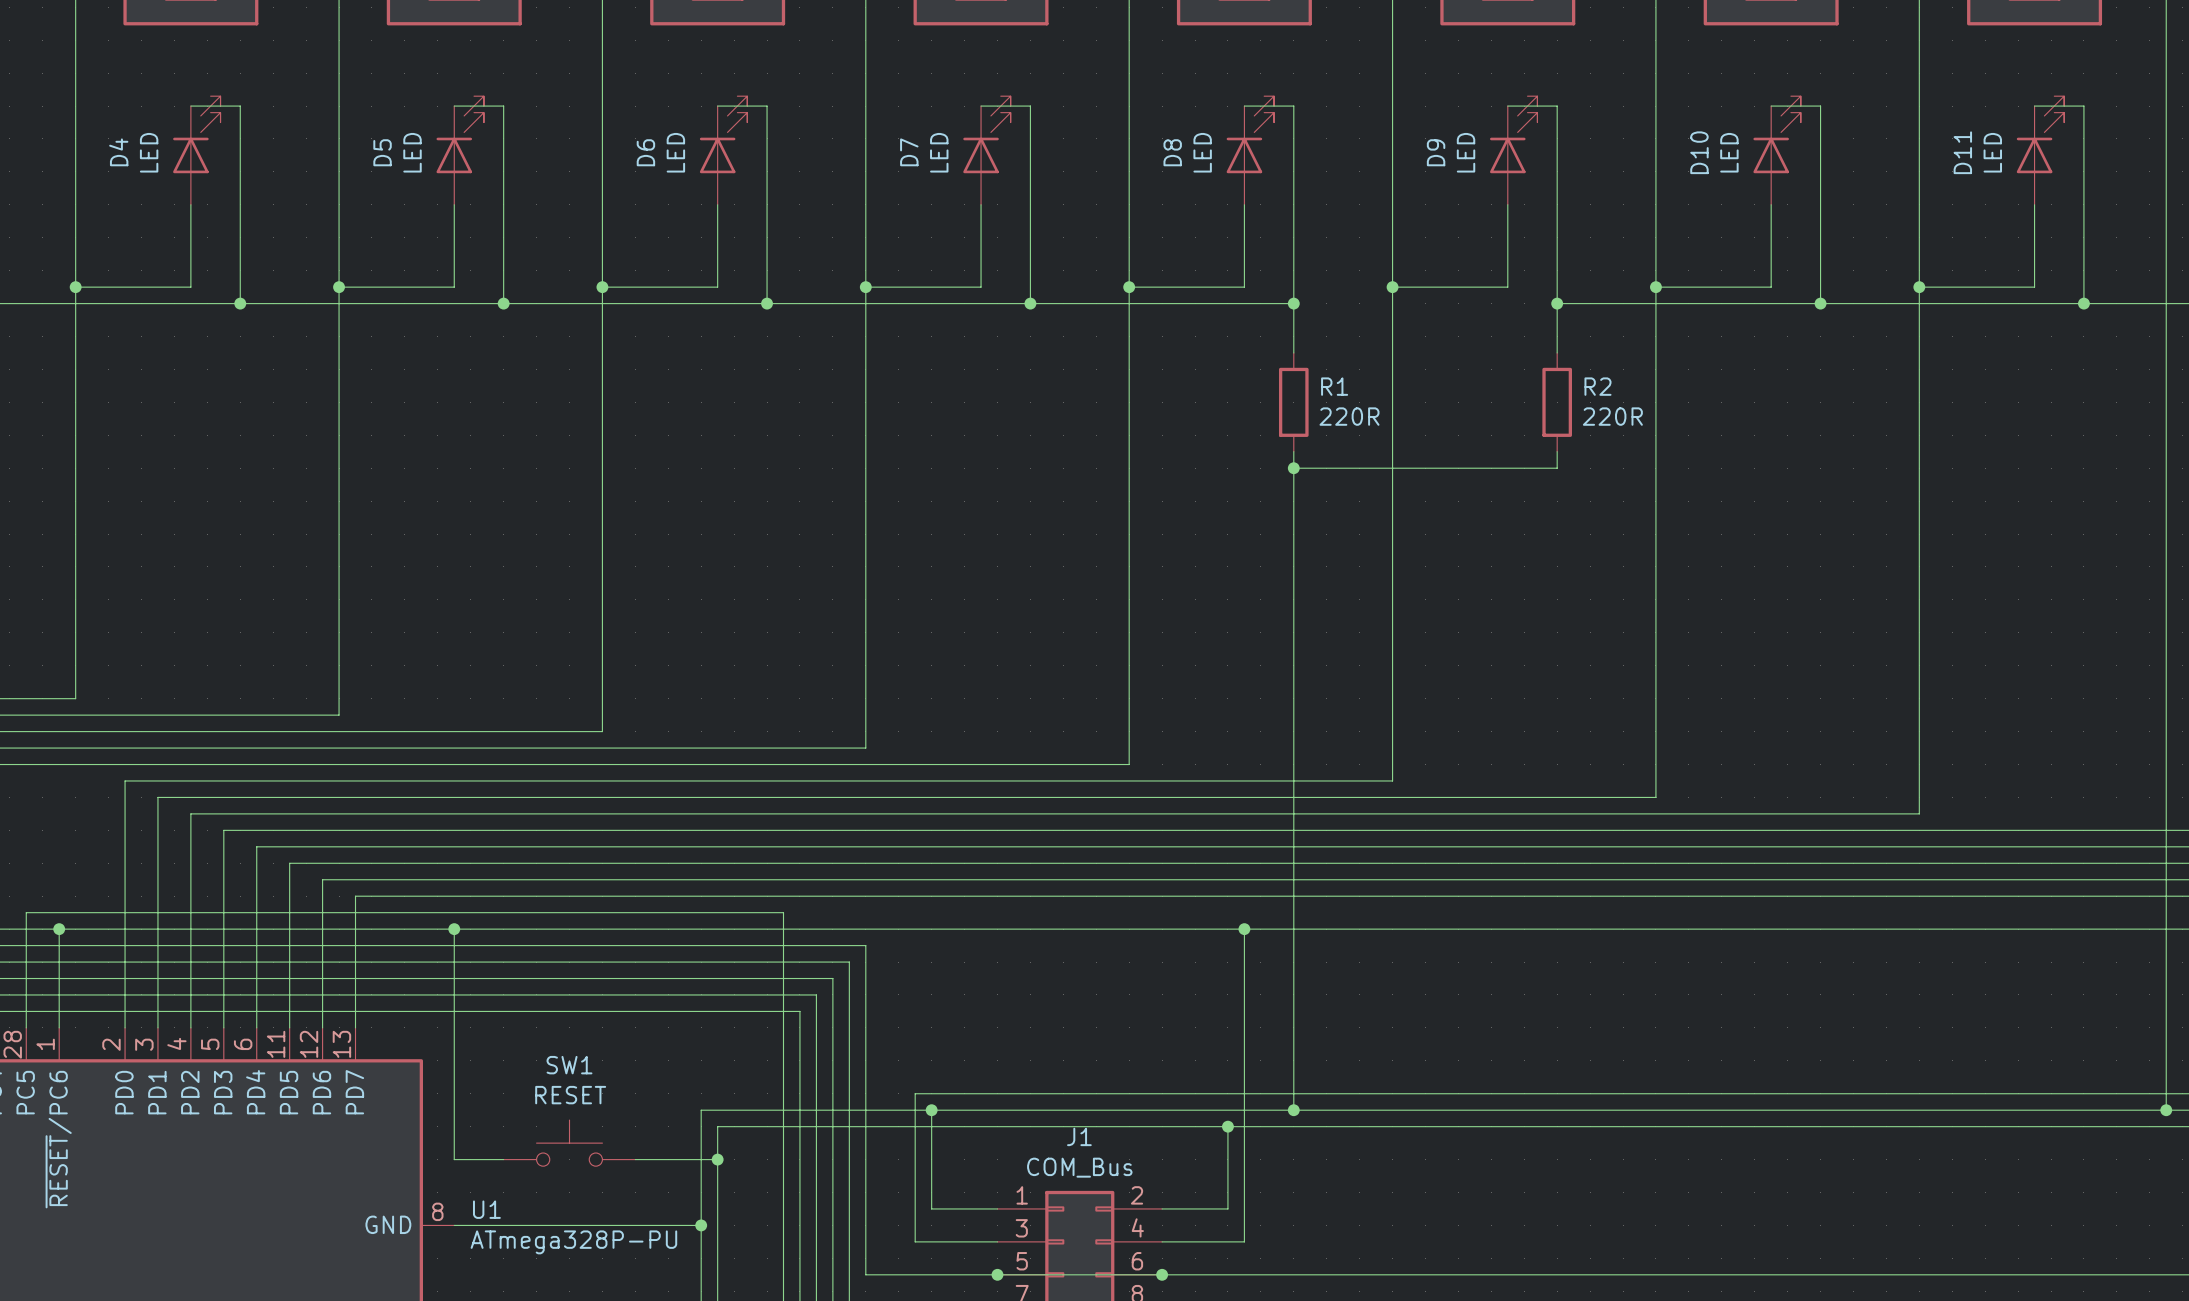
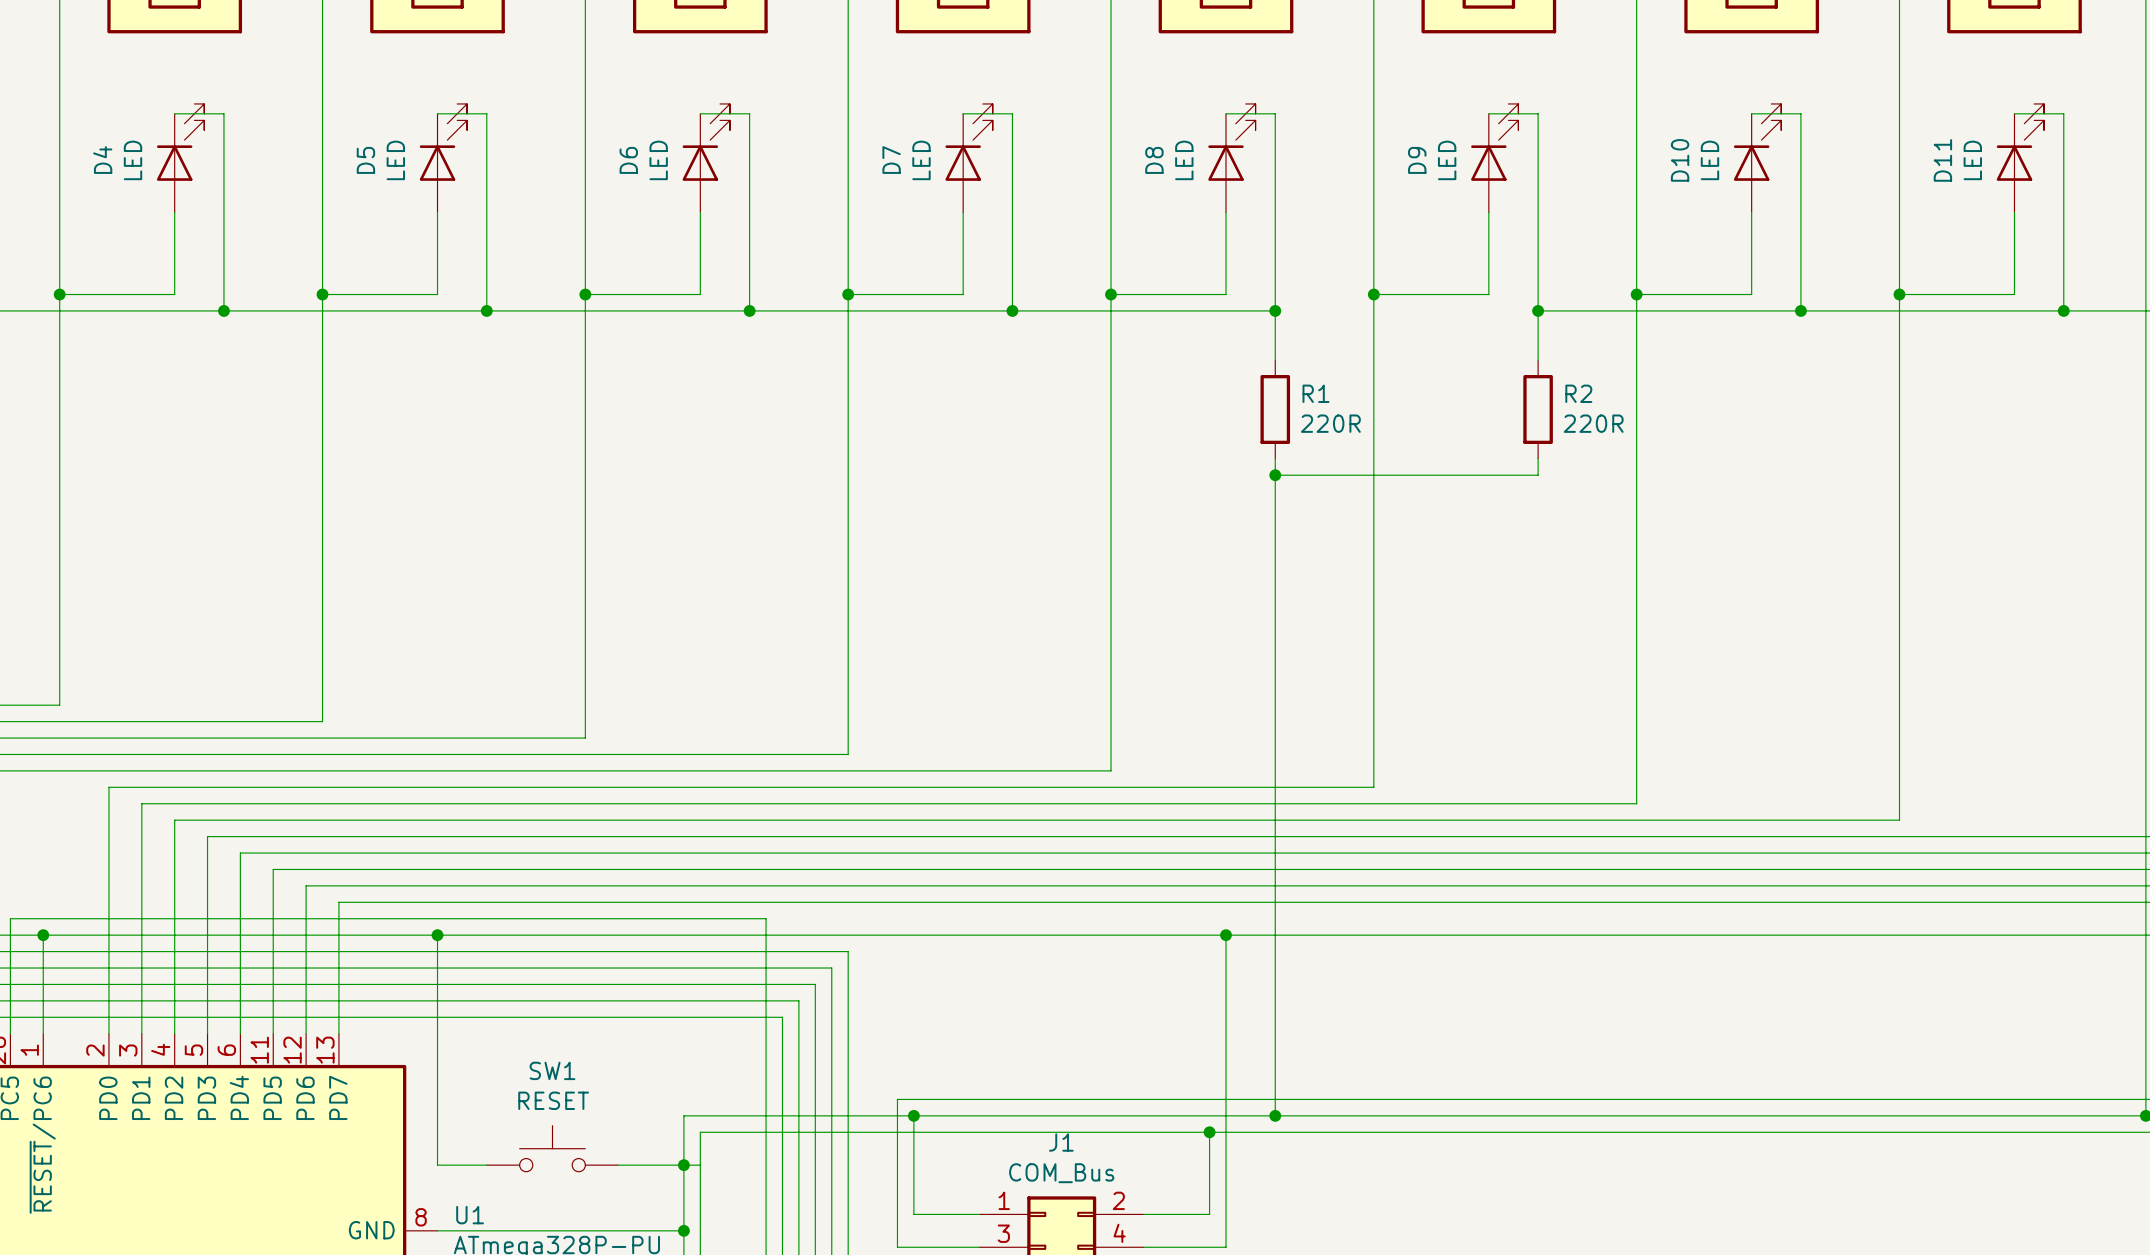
junction position: (717, 1159) -> (683, 1165)

